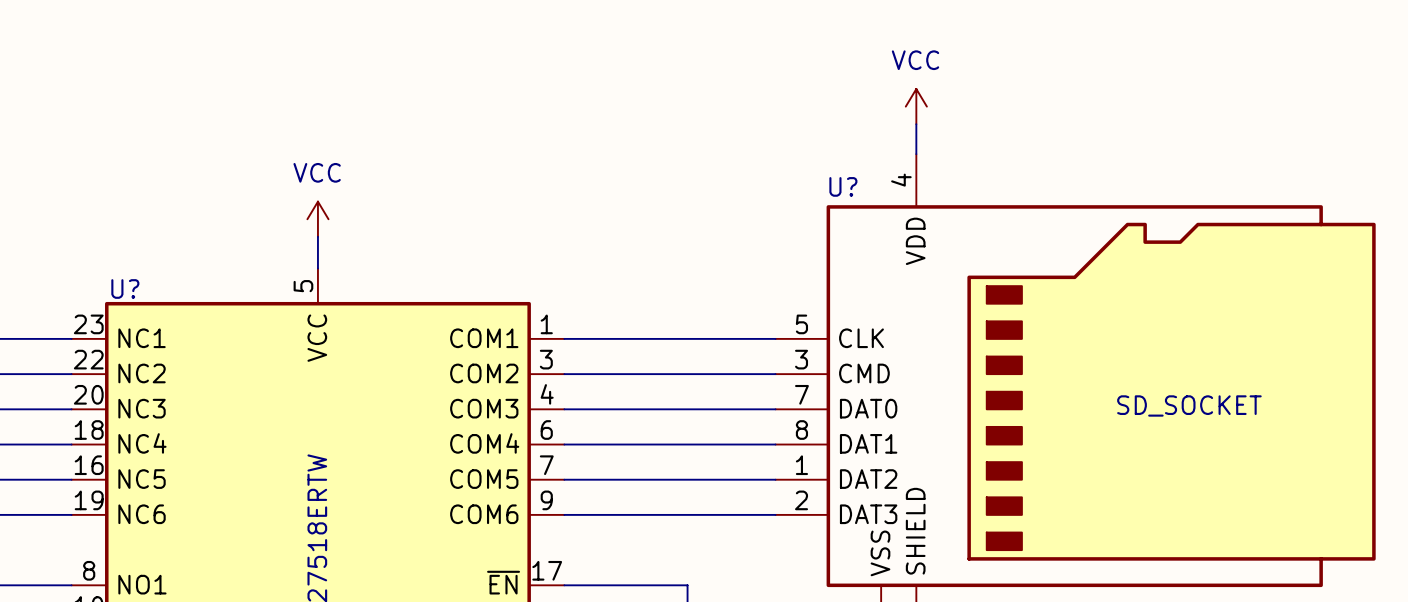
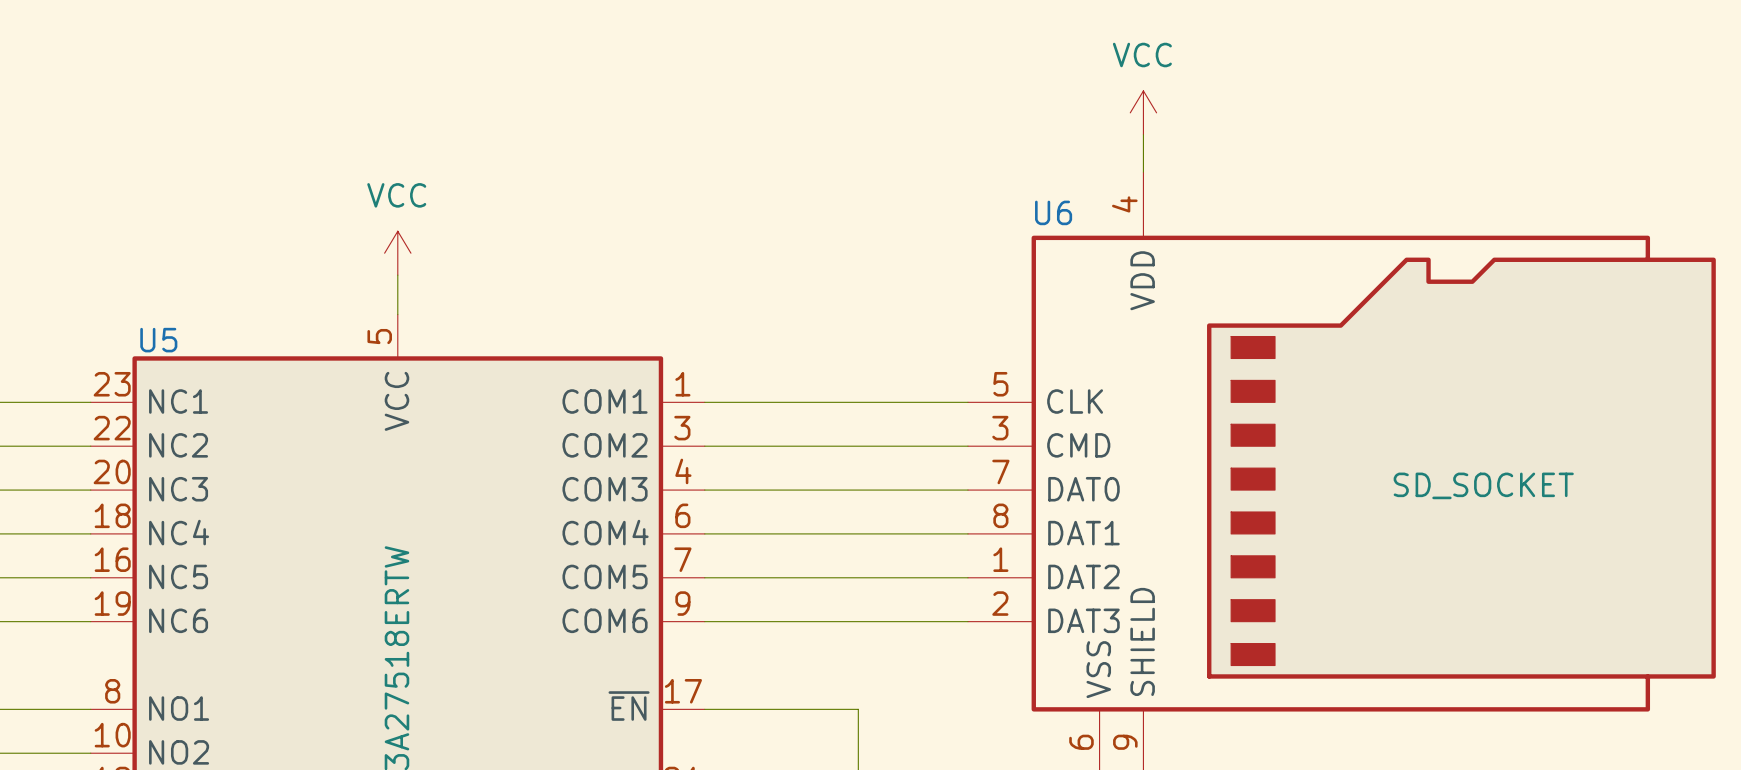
U? name: U? (843, 186) -> U6 (1053, 212)
U? name: U? (125, 288) -> U5 (158, 340)

